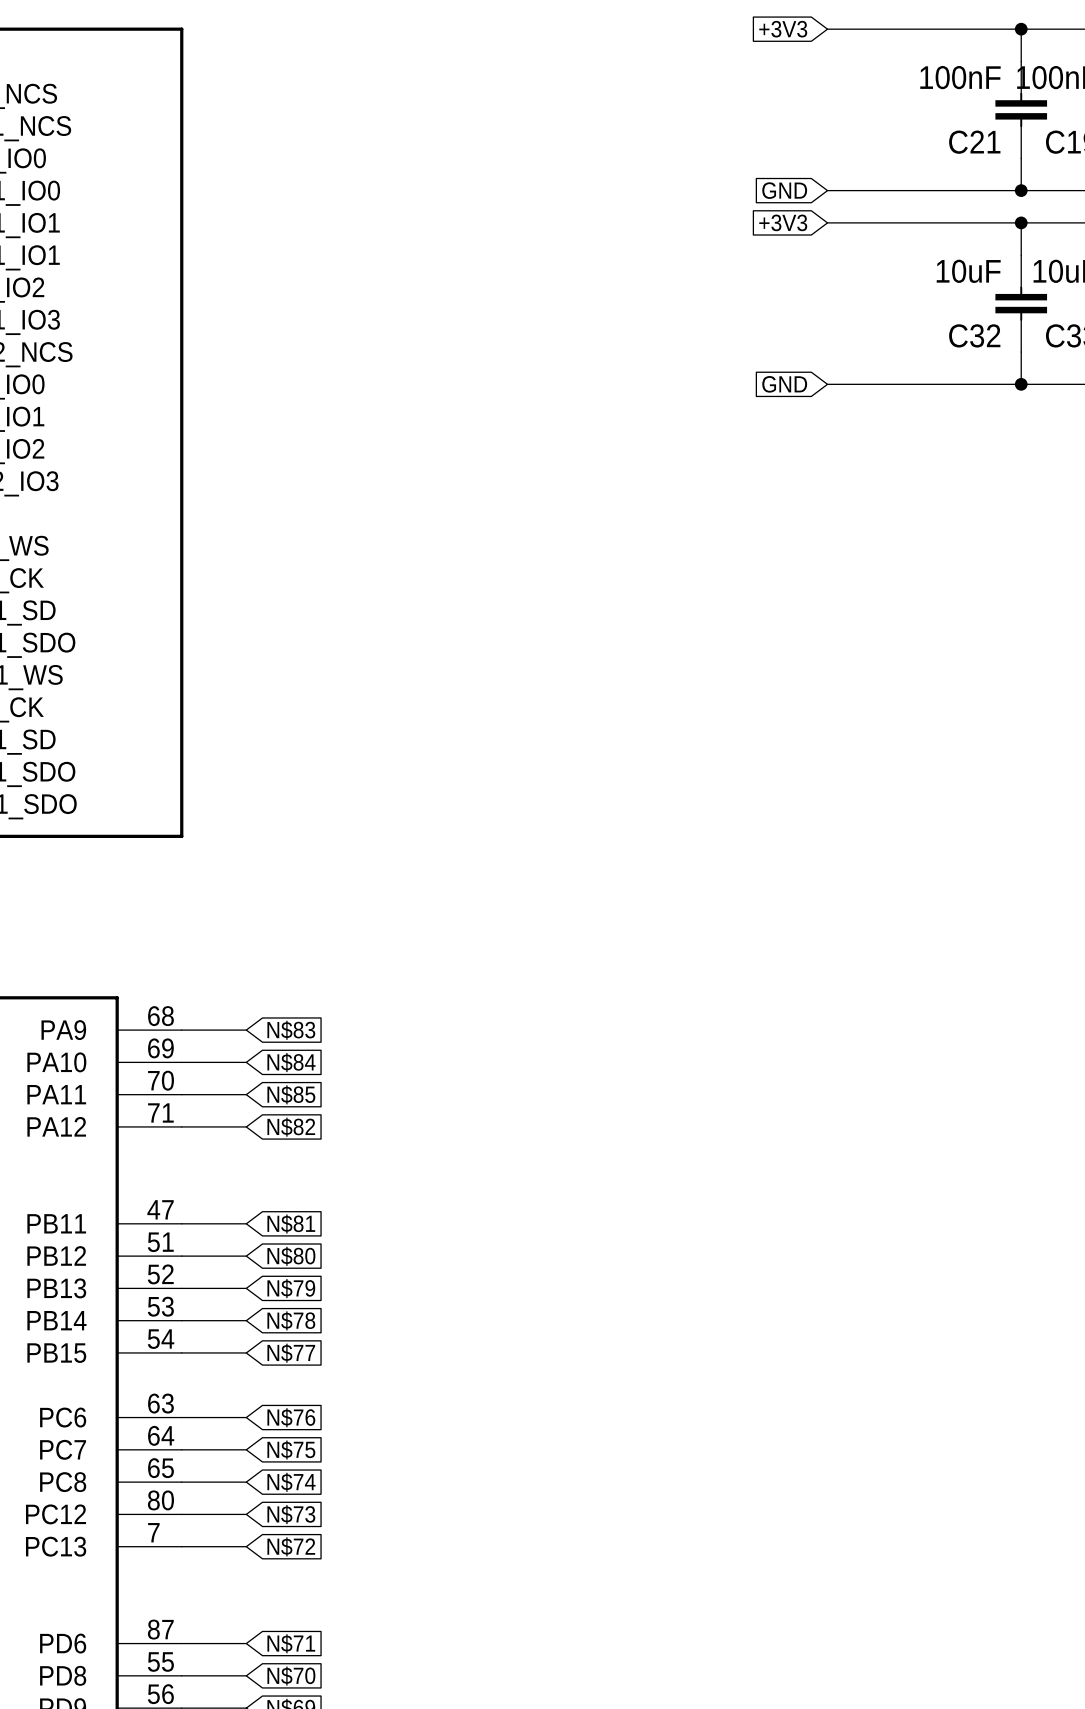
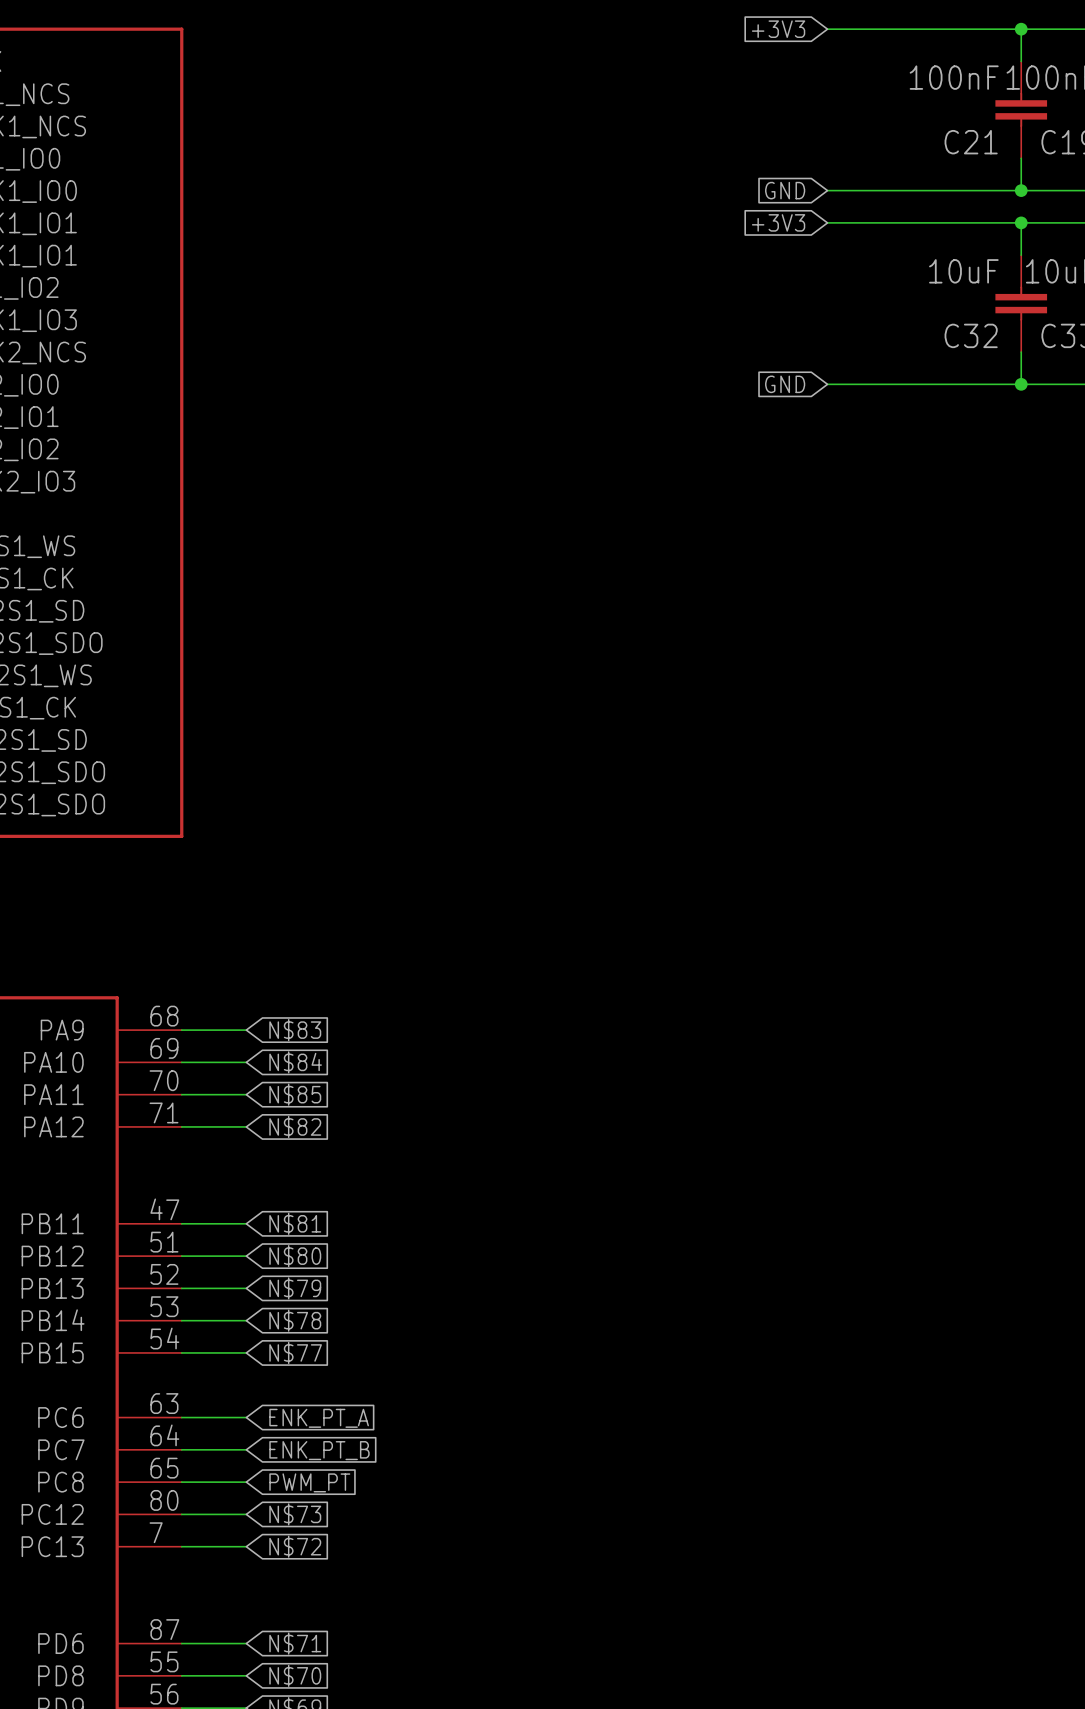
global label: N$76 (291, 1417) -> ENK_PT_A (319, 1418)
global label: N$75 (291, 1450) -> ENK_PT_B (319, 1450)
global label: N$74 (291, 1482) -> PWM_PT (309, 1482)

